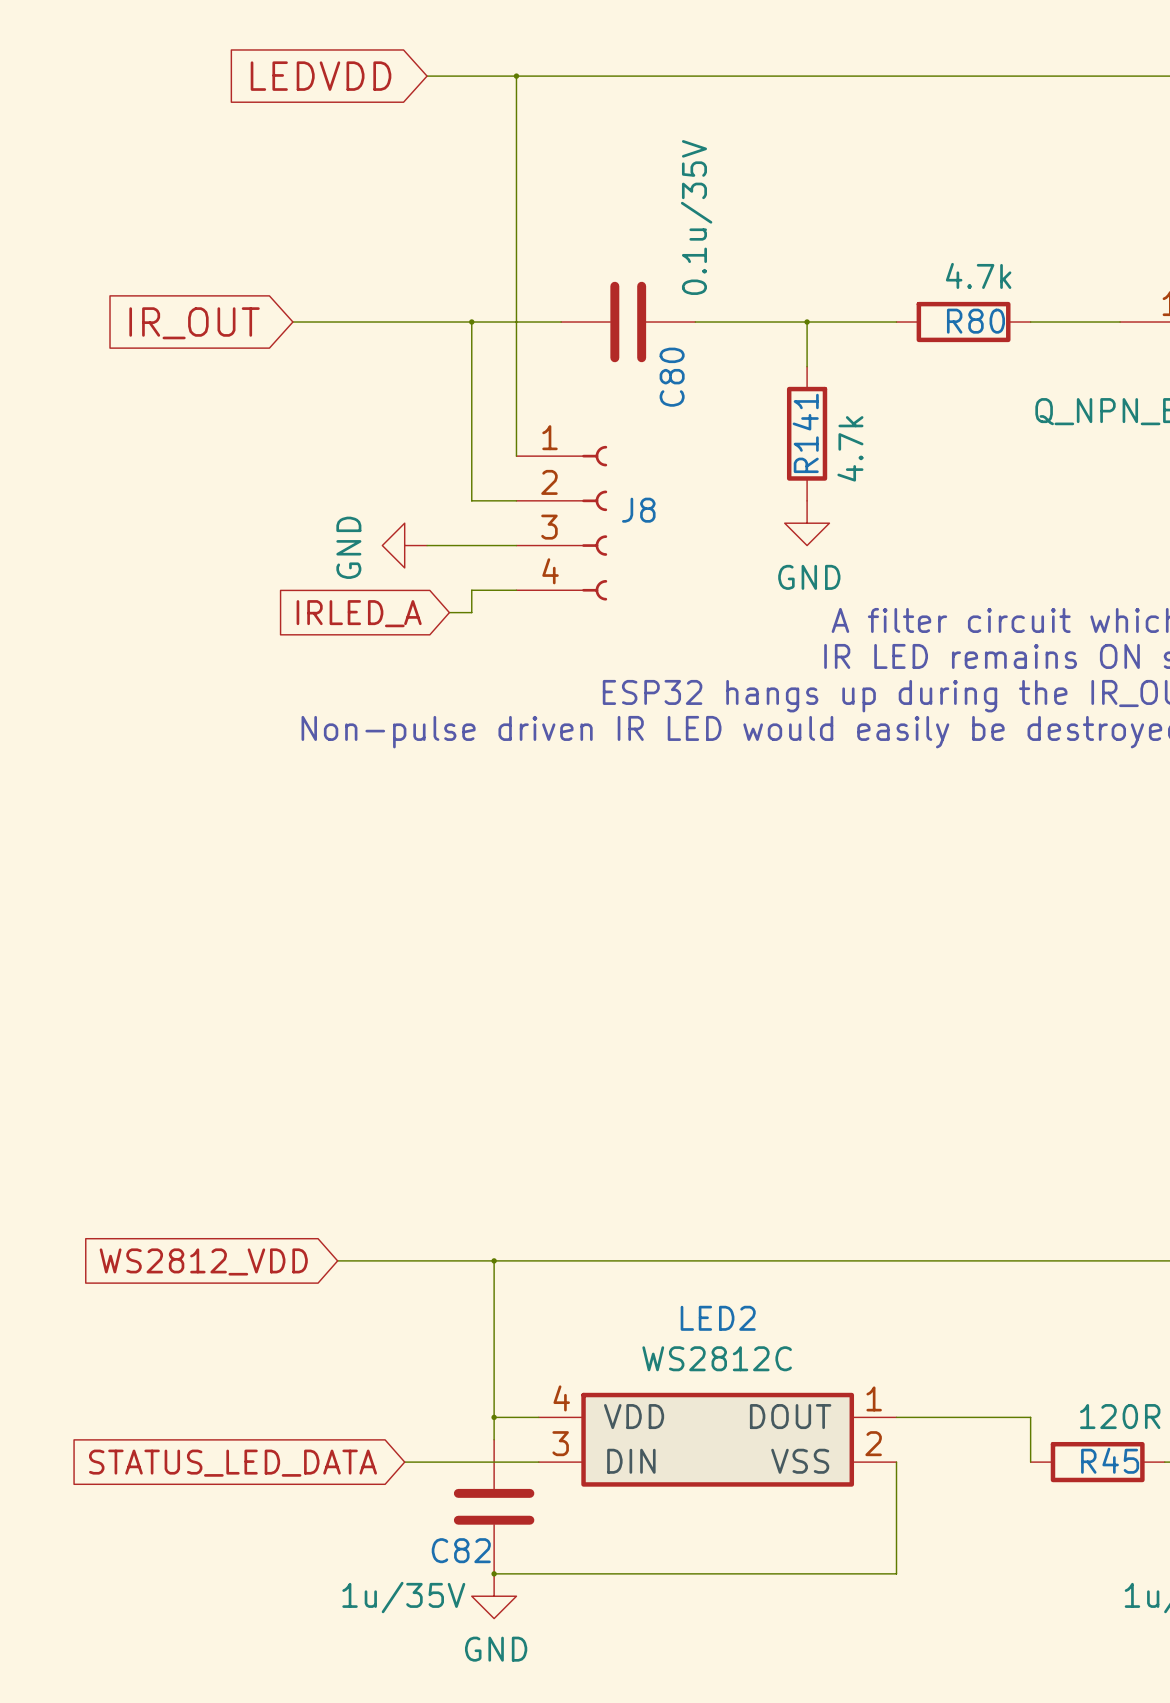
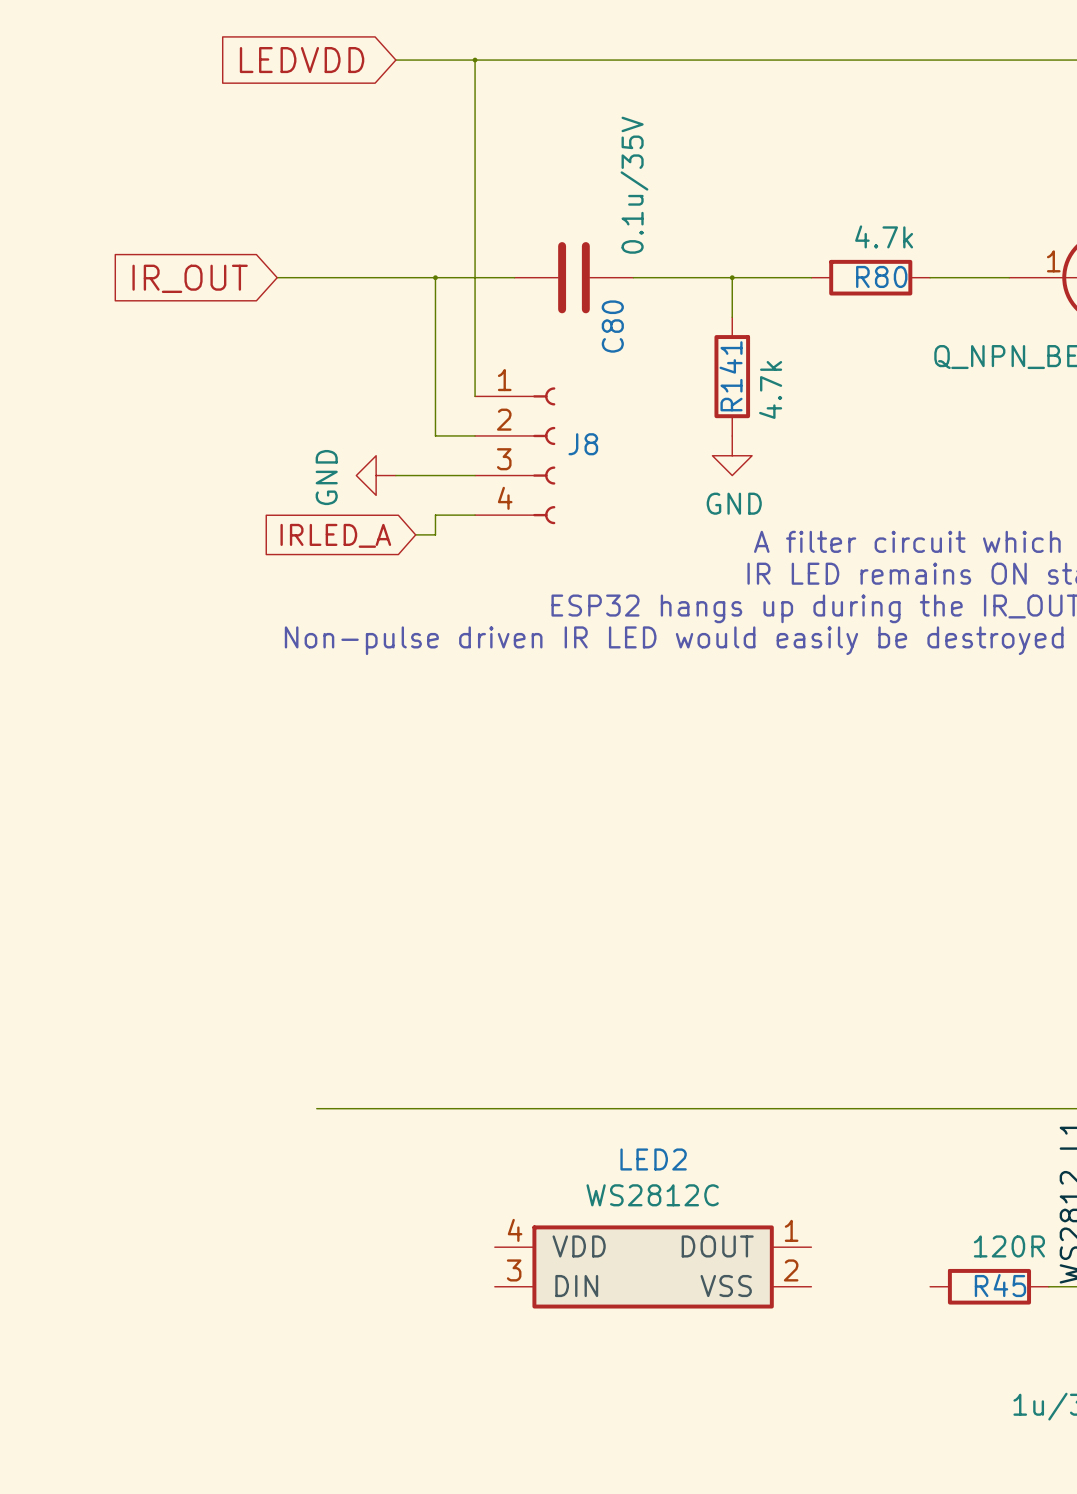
wire: (494, 1260) (494, 1439) -> none
junction: (494, 1260) -> none
global label: WS2812_VDD (203, 1261) -> none
wire: (494, 1417) (538, 1417) -> none
junction: (494, 1417) -> none
wire: (896, 1417) (1030, 1417) (1030, 1462) -> none
wire: (404, 1462) (538, 1462) -> none
wire: (896, 1462) (896, 1573) (494, 1573) -> none
global label: STATUS_LED_DATA (233, 1463) -> none
C82: 1u/35V (494, 1506) -> none
junction: (494, 1573) -> none
power symbol: GND (494, 1596) -> none

